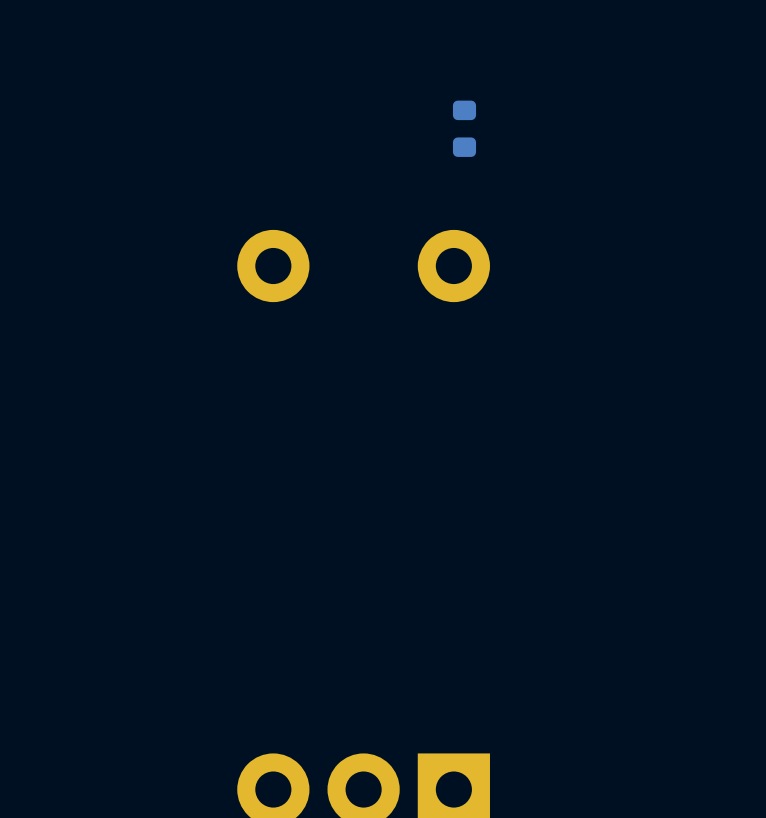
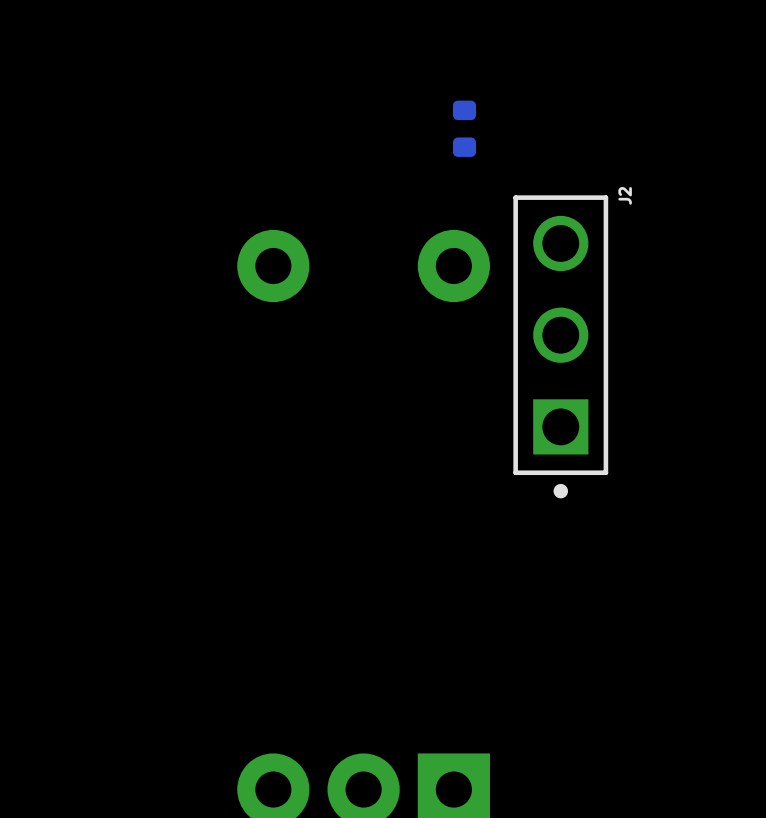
J2: none -> (560, 346)

